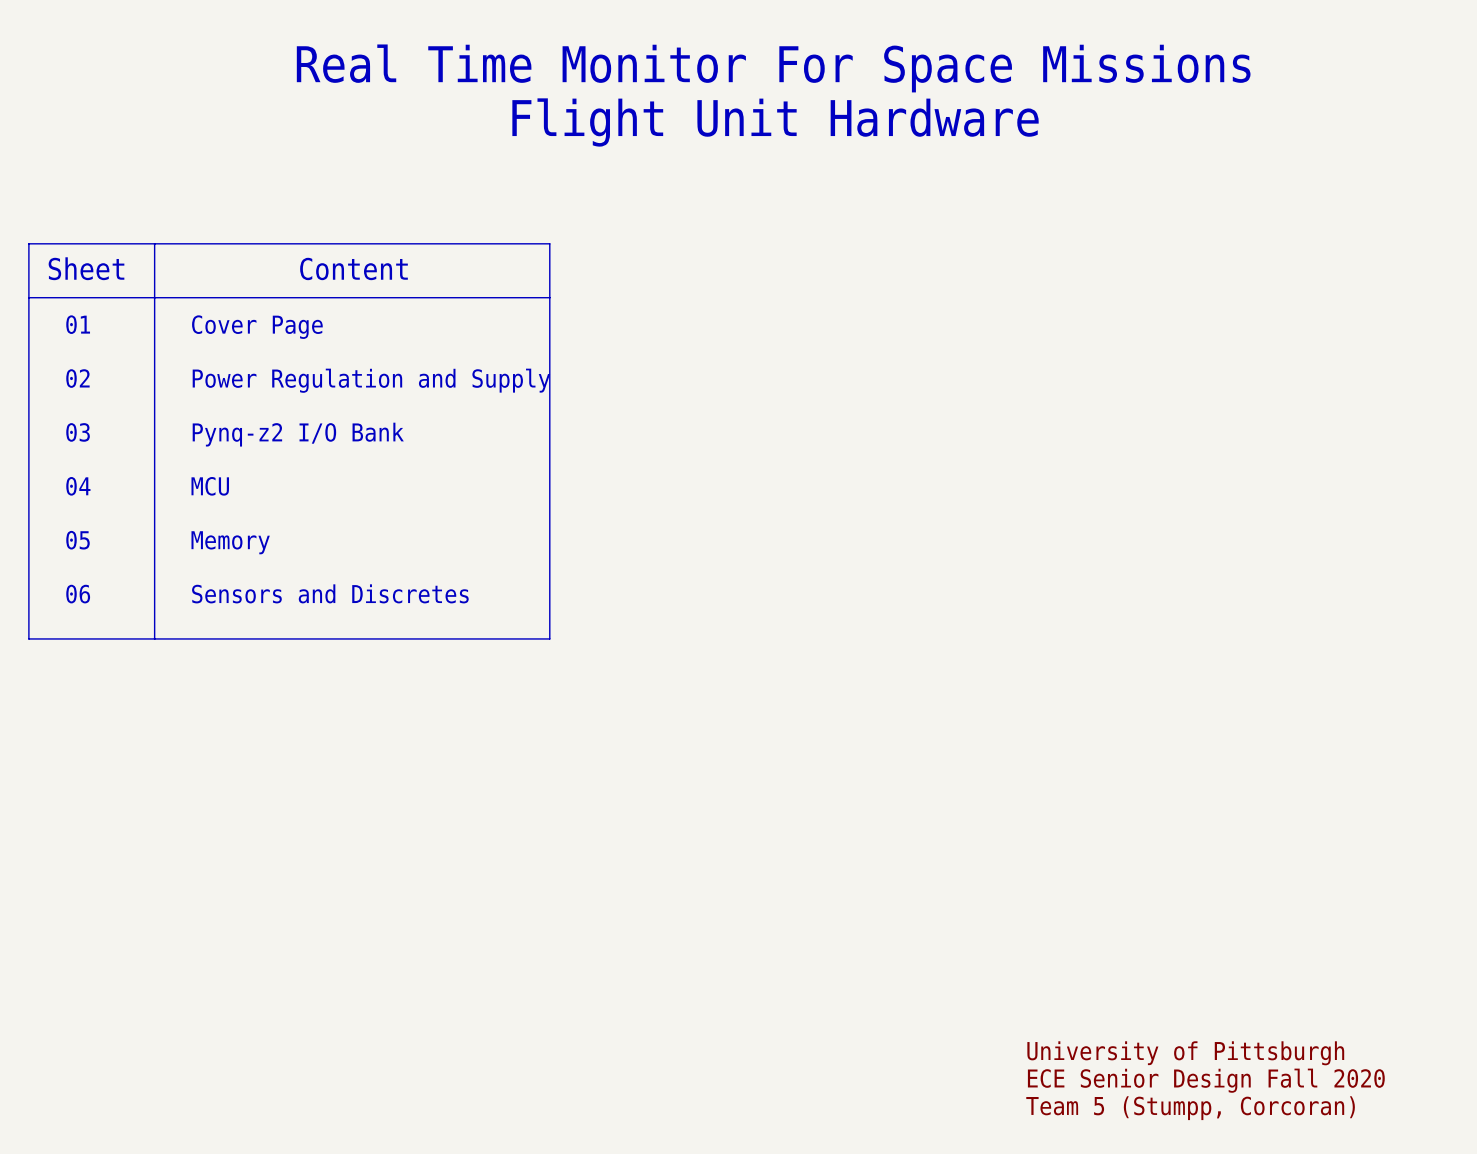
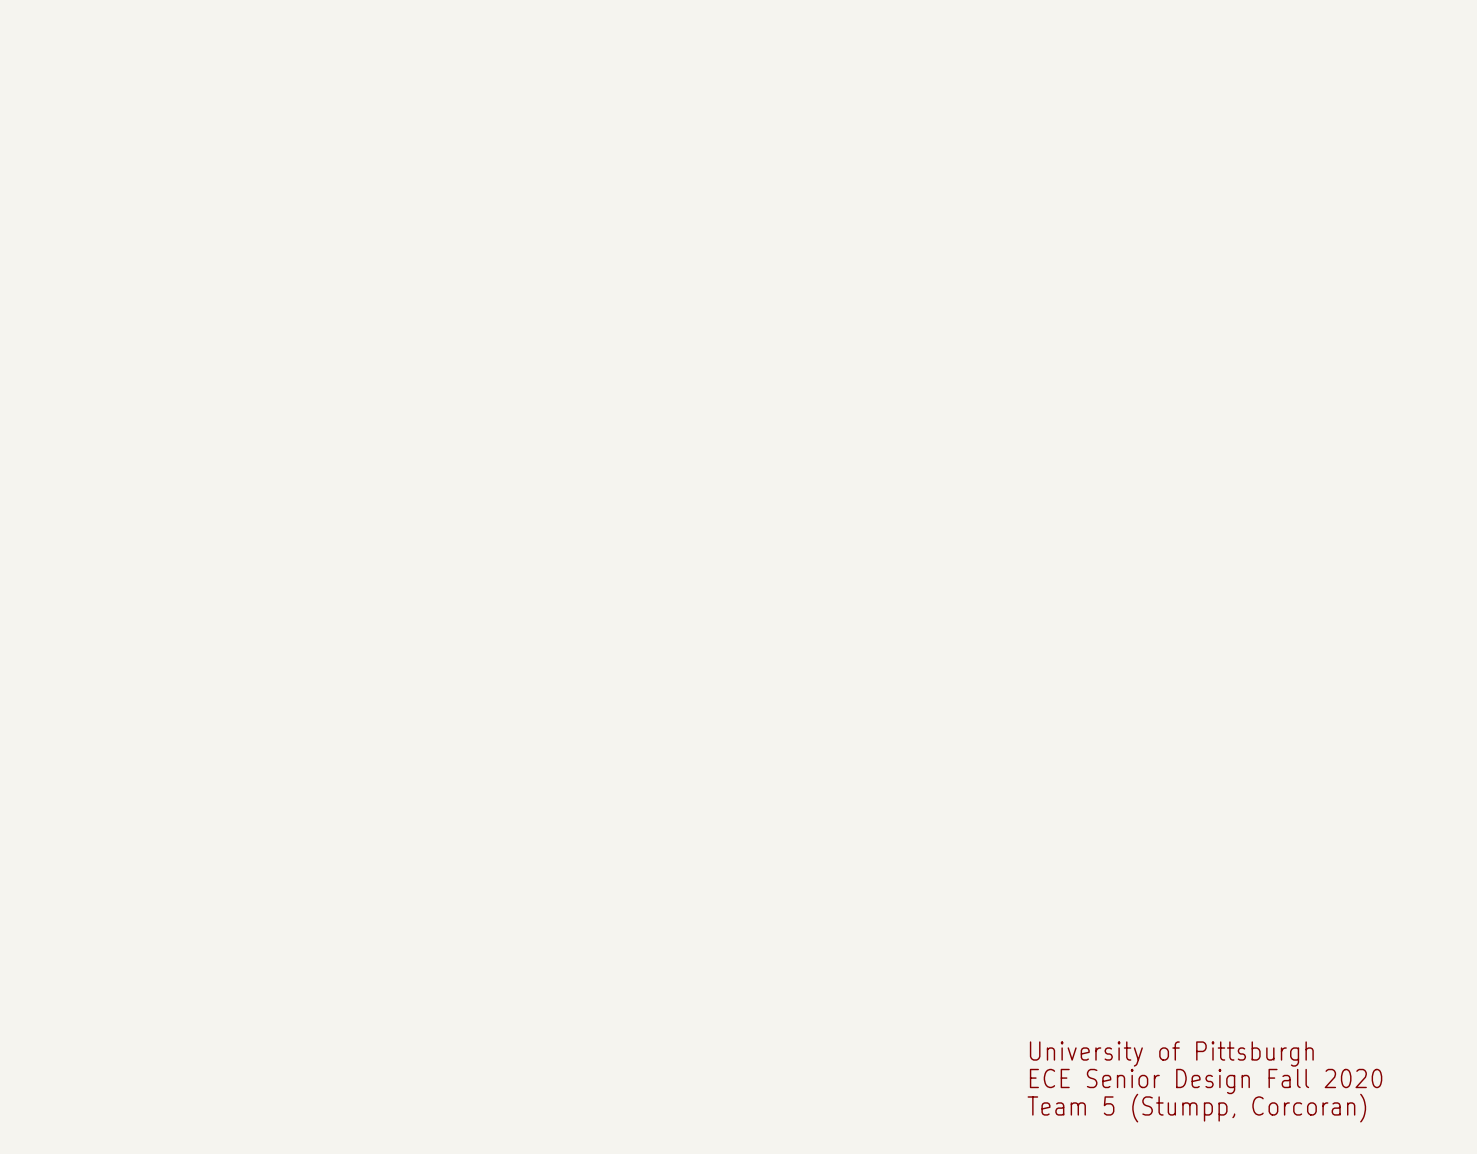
text: Real Time Monitor For Space Missions (773, 68) -> none
text: Flight Unit Hardware (775, 122) -> none
line: (28, 243) (28, 638) (549, 638) (549, 243) (28, 243) -> none
line: (154, 243) (154, 638) -> none
text: Sheet (86, 268) -> none
text: Content (353, 268) -> none
line: (28, 297) (549, 297) -> none
text: 01 (78, 324) -> none
text: Cover Page (257, 327) -> none
text: 02 (77, 378) -> none
text: Power Regulation and Supply (371, 380) -> none
text: 03 (78, 432) -> none
text: Pynq-z2 I/O Bank (298, 434) -> none
text: 04 (78, 486) -> none
text: MCU (210, 486) -> none
text: 05 (78, 540) -> none
text: Memory (230, 542) -> none
text: Sensors and Discretes (330, 593) -> none
text: 06 (78, 594) -> none

